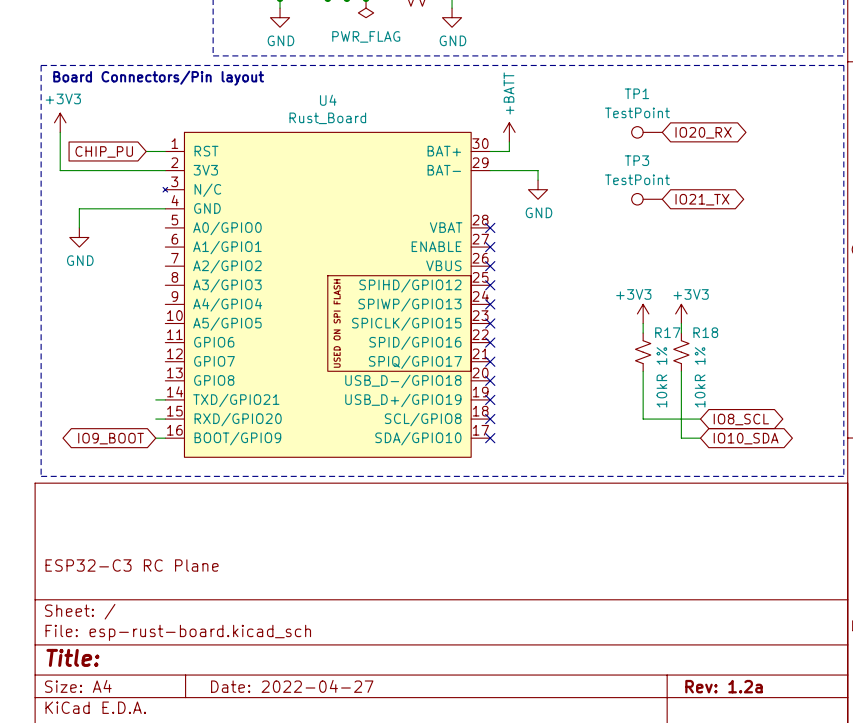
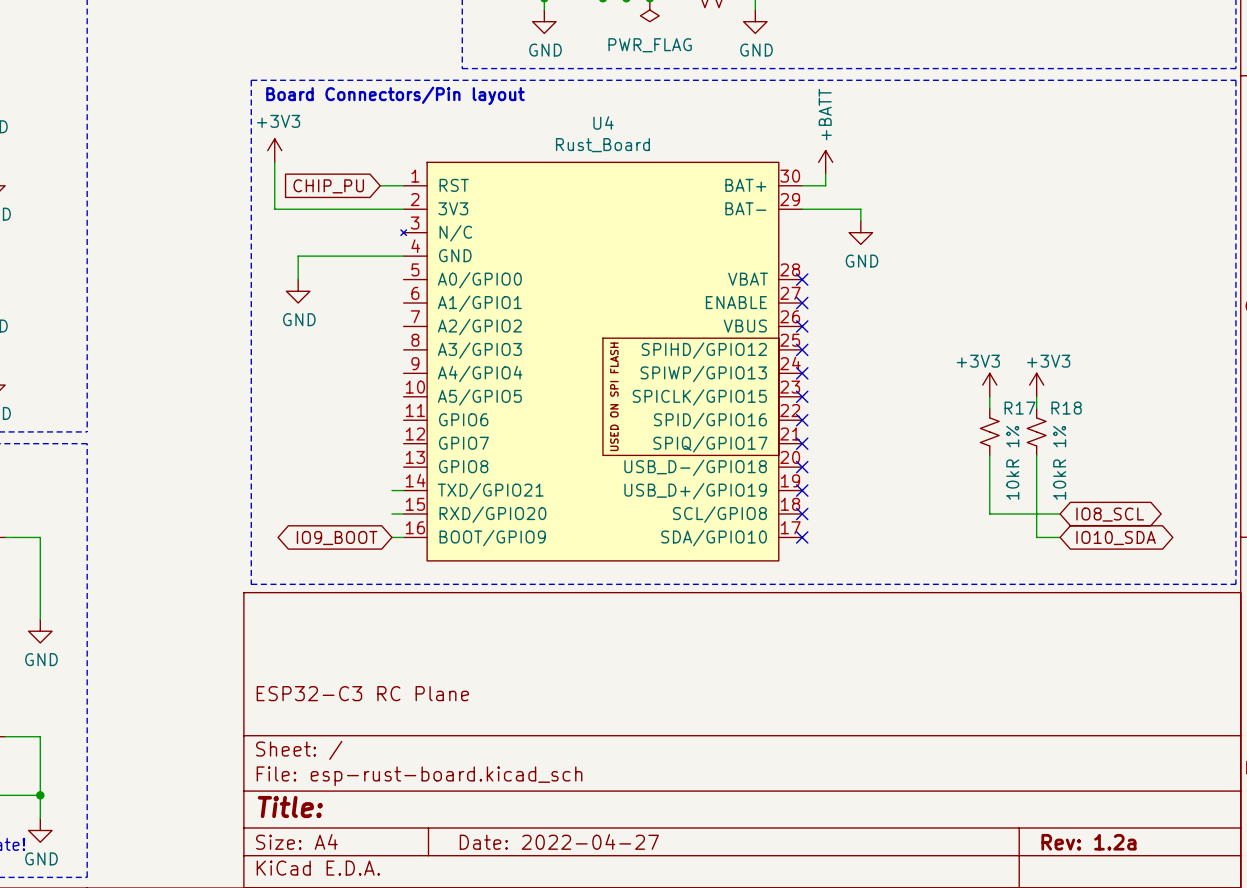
TP1: TestPoint (646, 132) -> none
global label: IO20_RX (703, 132) -> none
TP3: TestPoint (646, 199) -> none
global label: IO21_TX (702, 199) -> none

